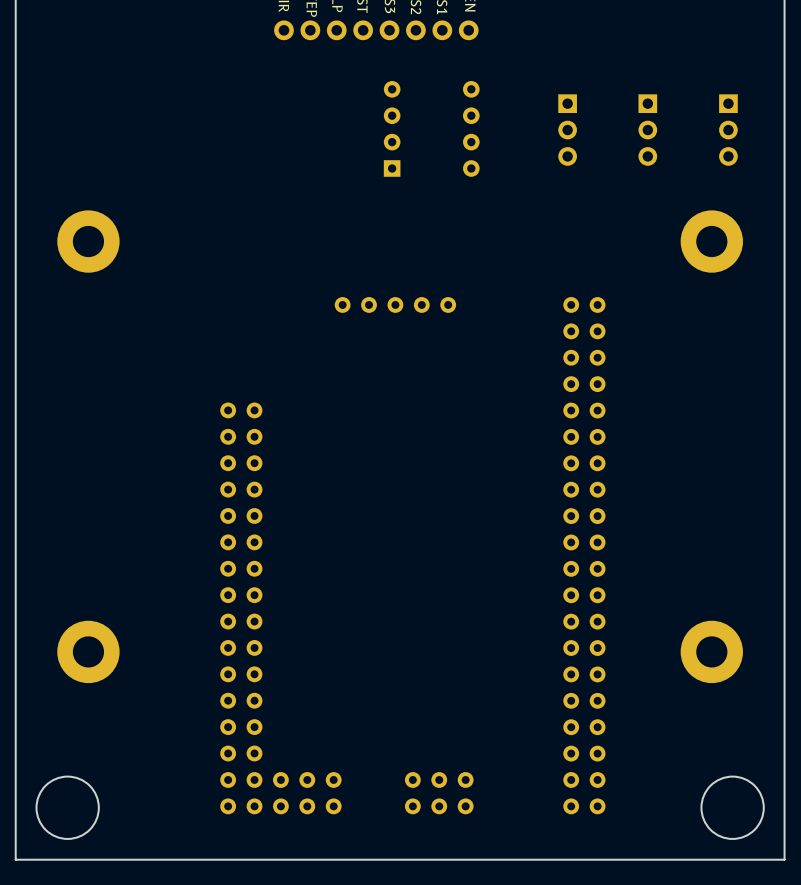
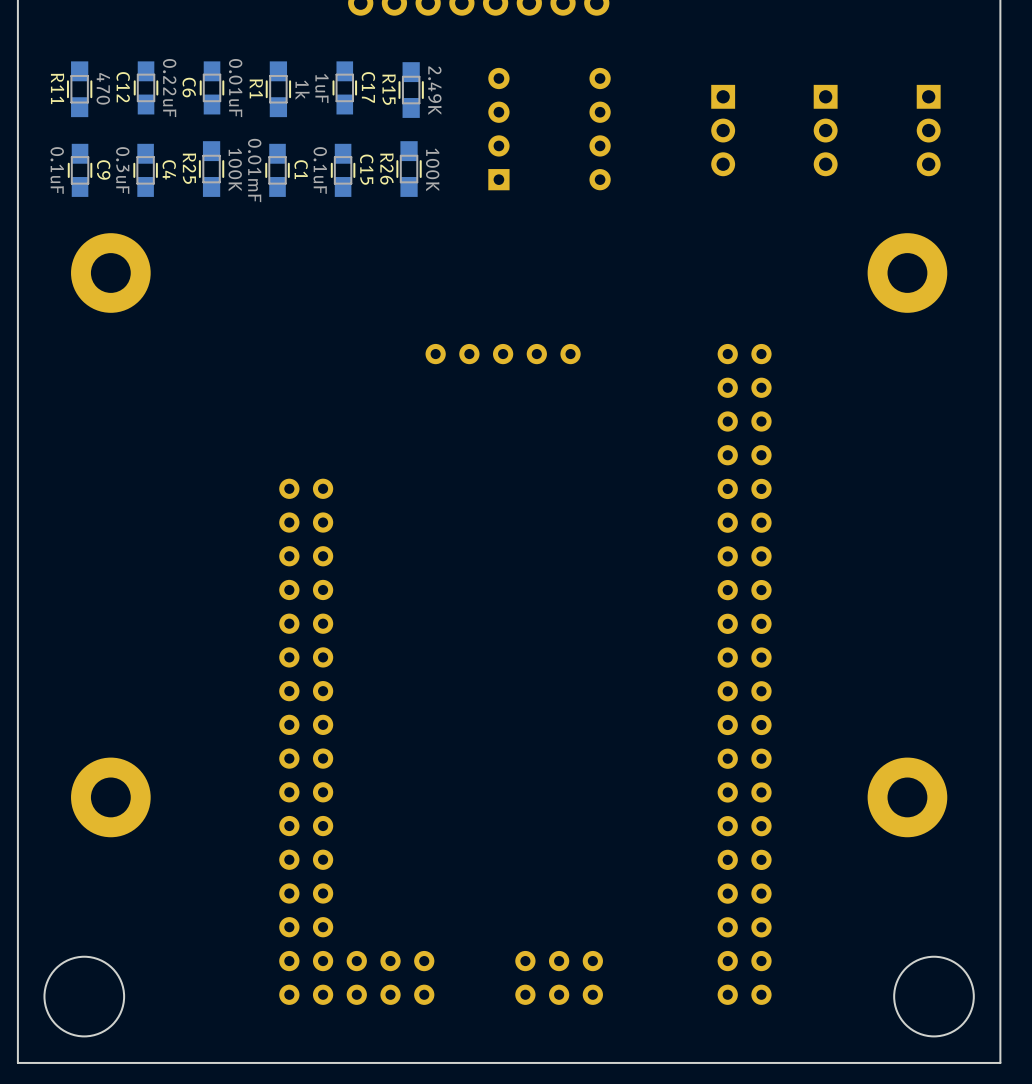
C12: none -> 0.22uF (146, 87)
C6: none -> 0.01uF (212, 87)
C17: none -> 1uF (344, 87)
R11: none -> 470 (79, 89)
R1: none -> 1k (278, 89)
R15: none -> 2.49K (411, 90)
R25: none -> 100K (211, 169)
R26: none -> 100K (409, 169)
C9: none -> 0.1uF (80, 170)
C4: none -> 0.3uF (145, 170)
C1: none -> 0.01mF (277, 170)
C15: none -> 0.1uF (343, 170)

